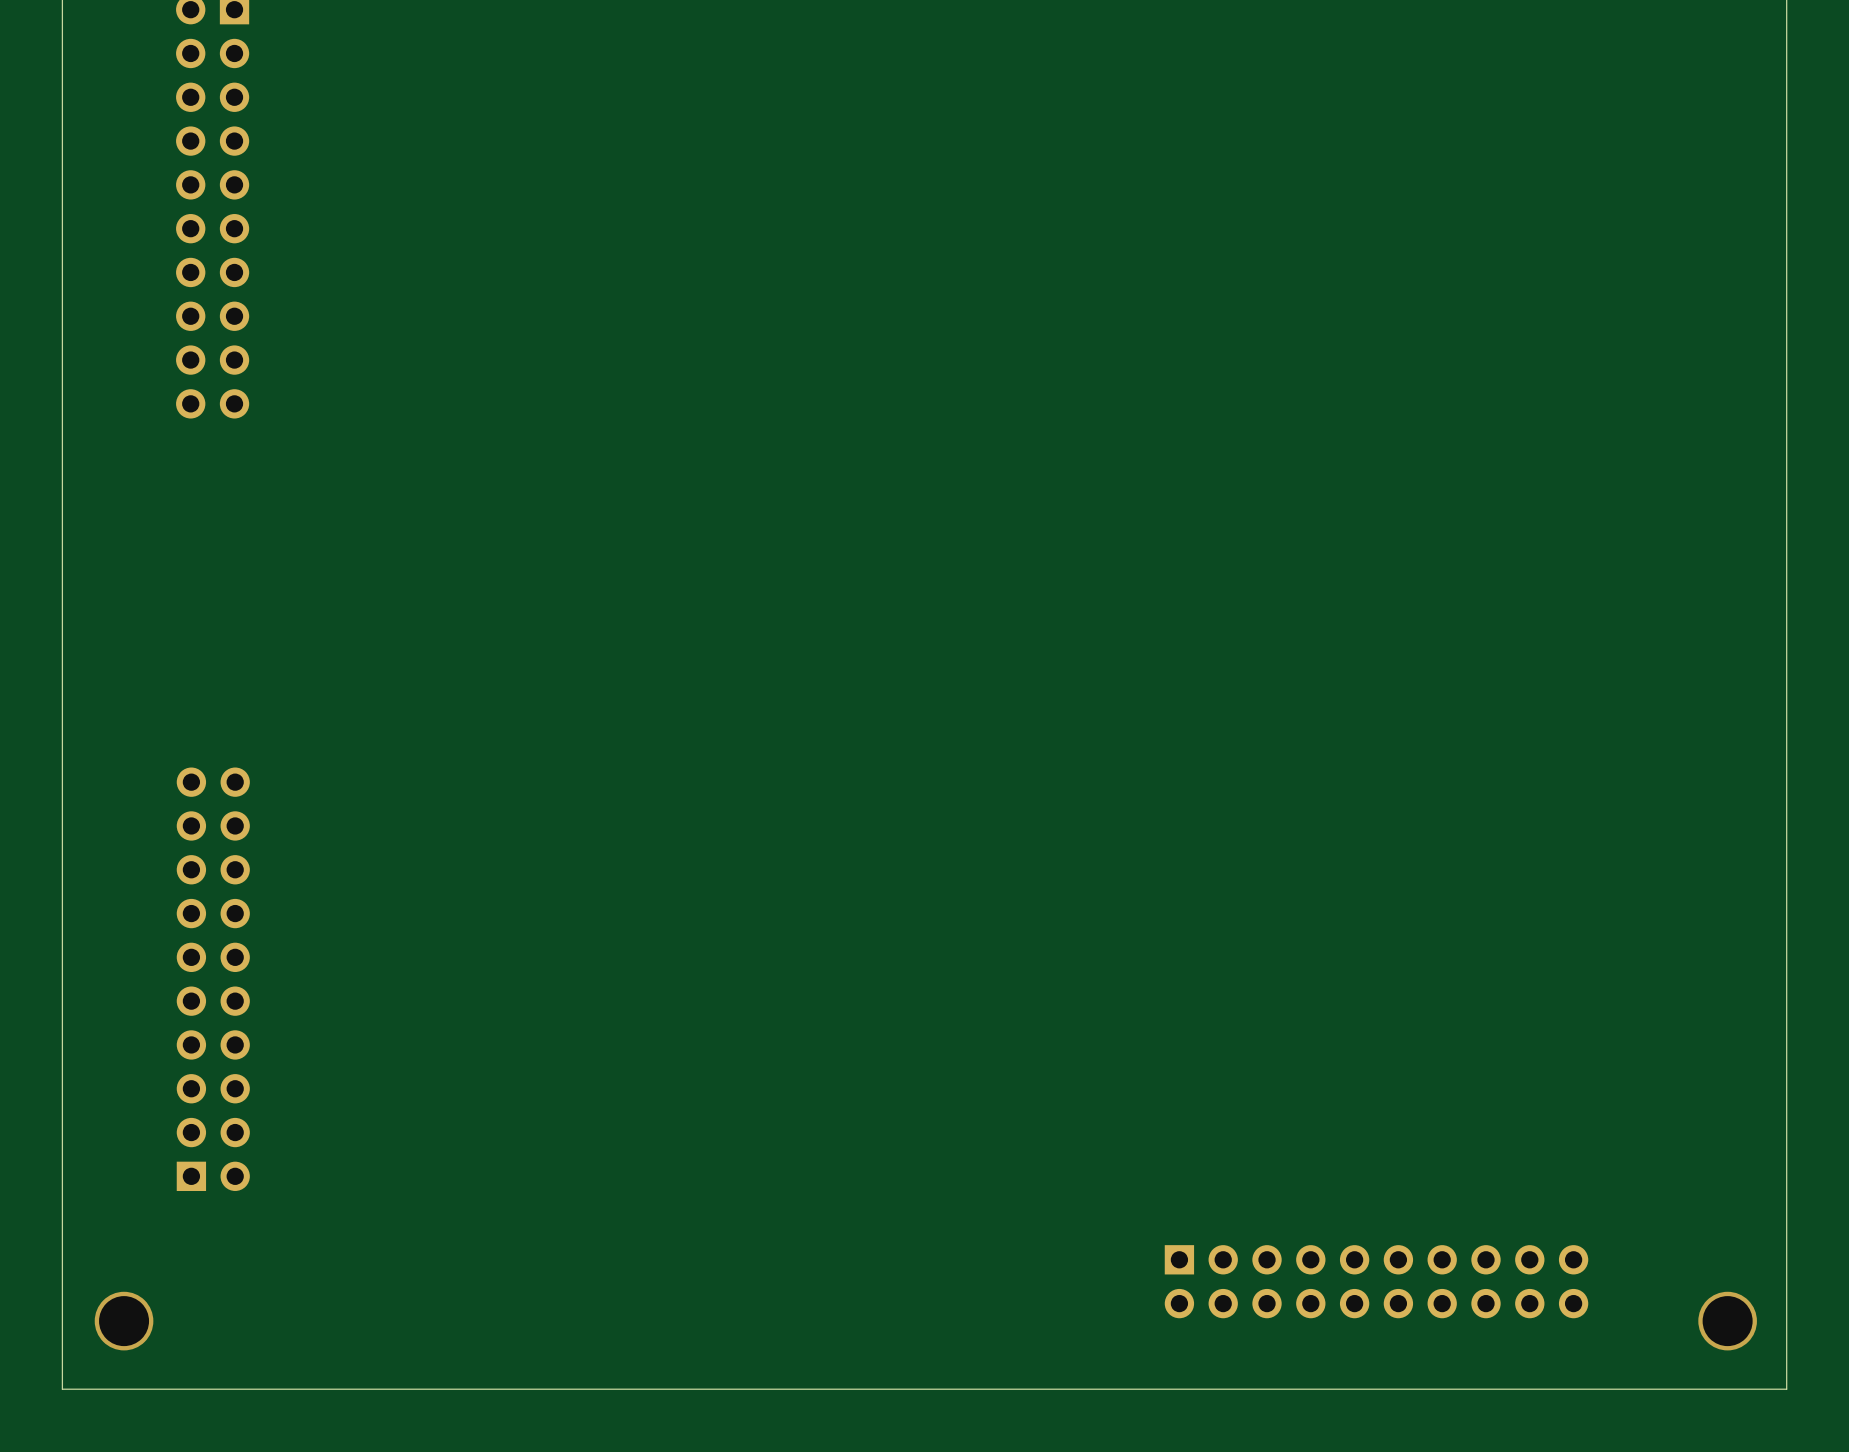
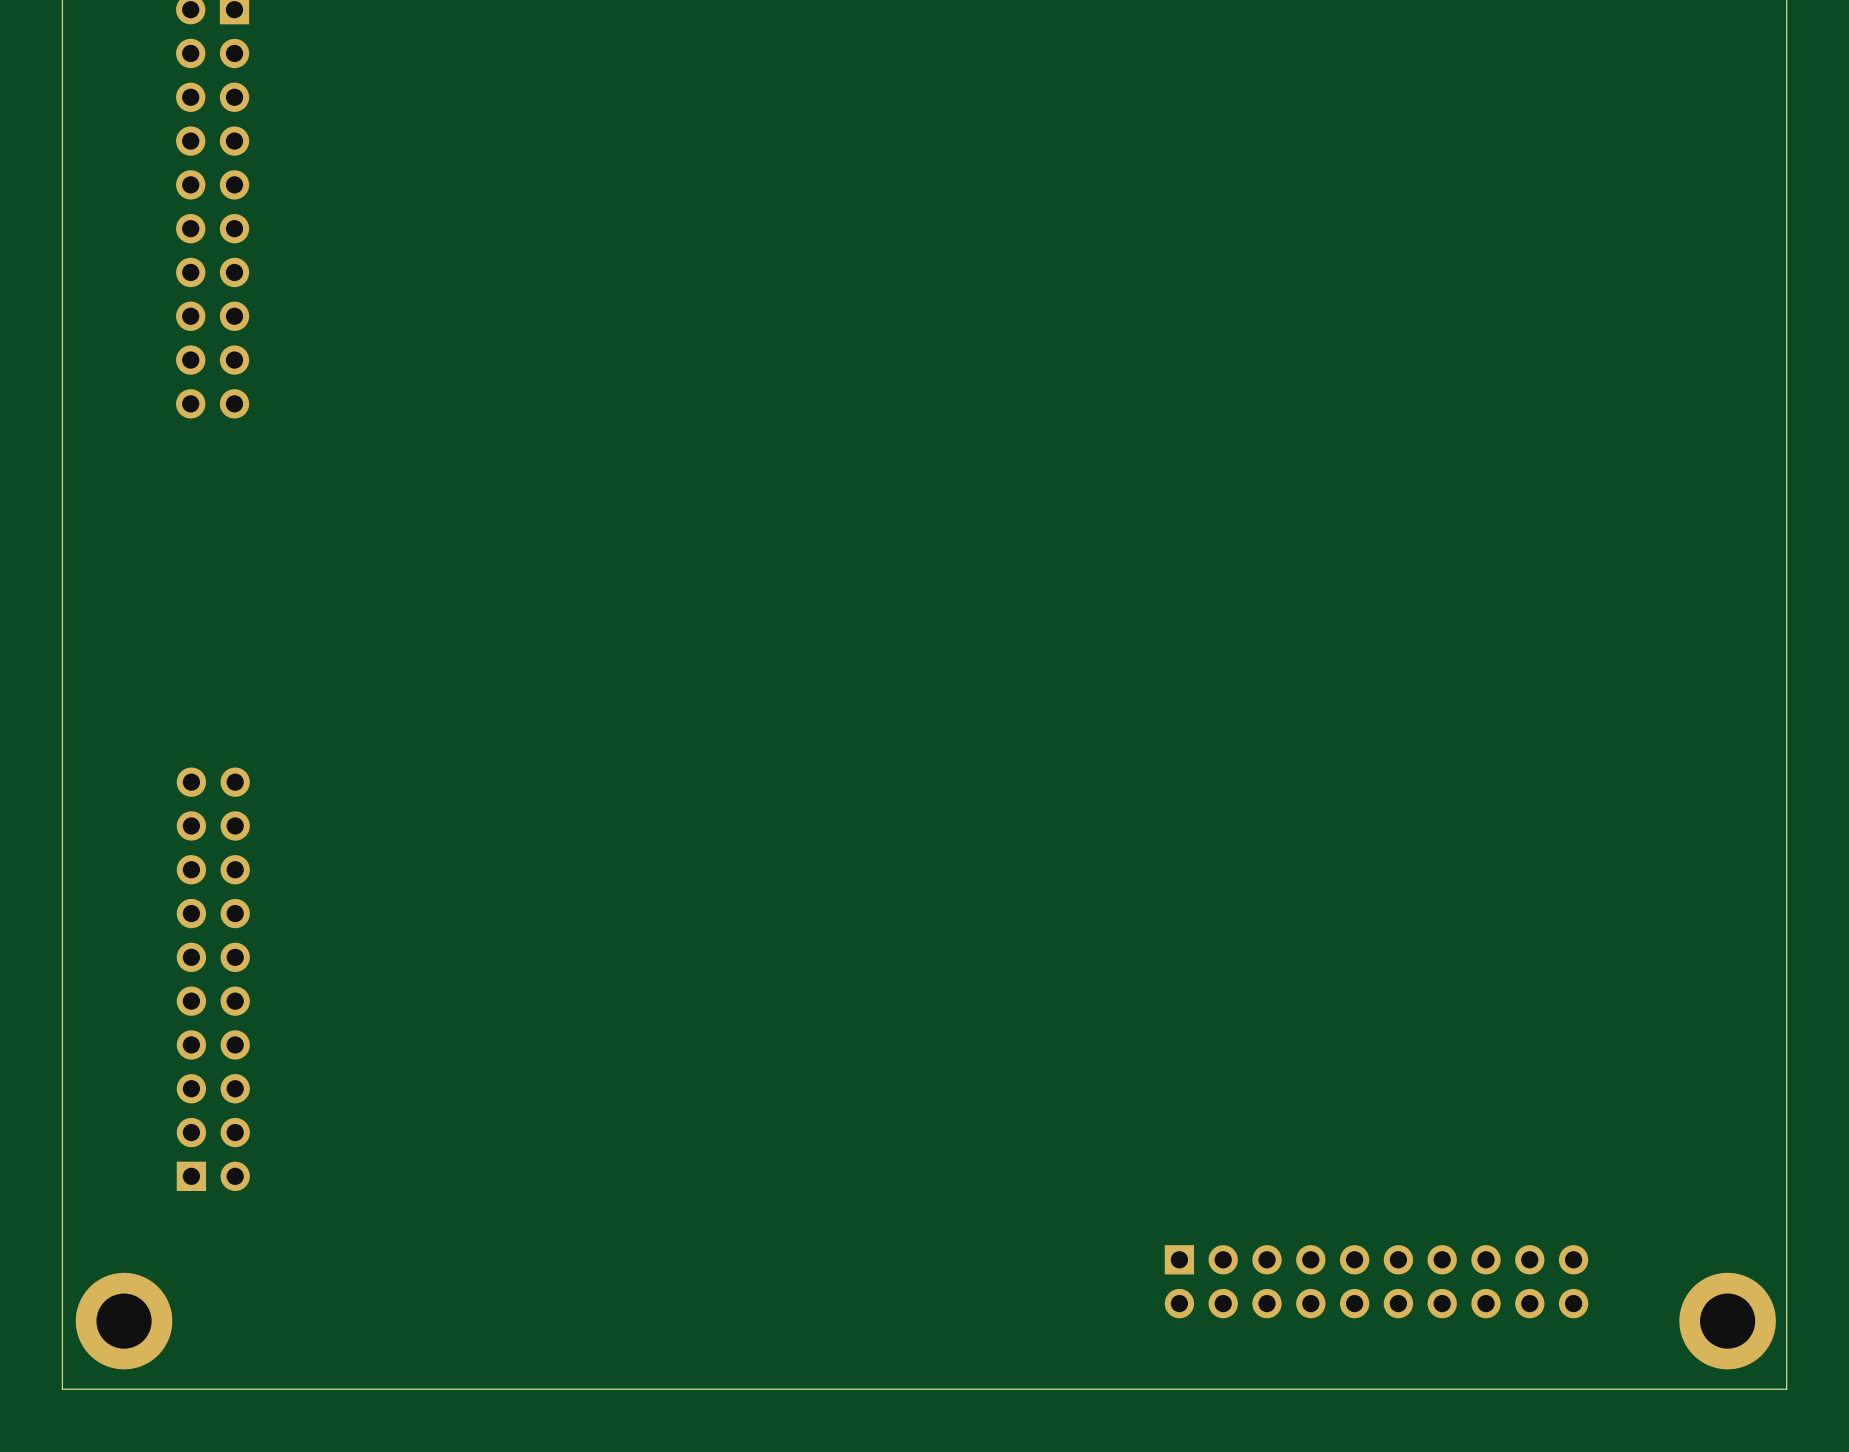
via: (124, 1321) -> none
part: none -> (124, 1321)
via: (1727, 1321) -> none
part: none -> (1727, 1321)

